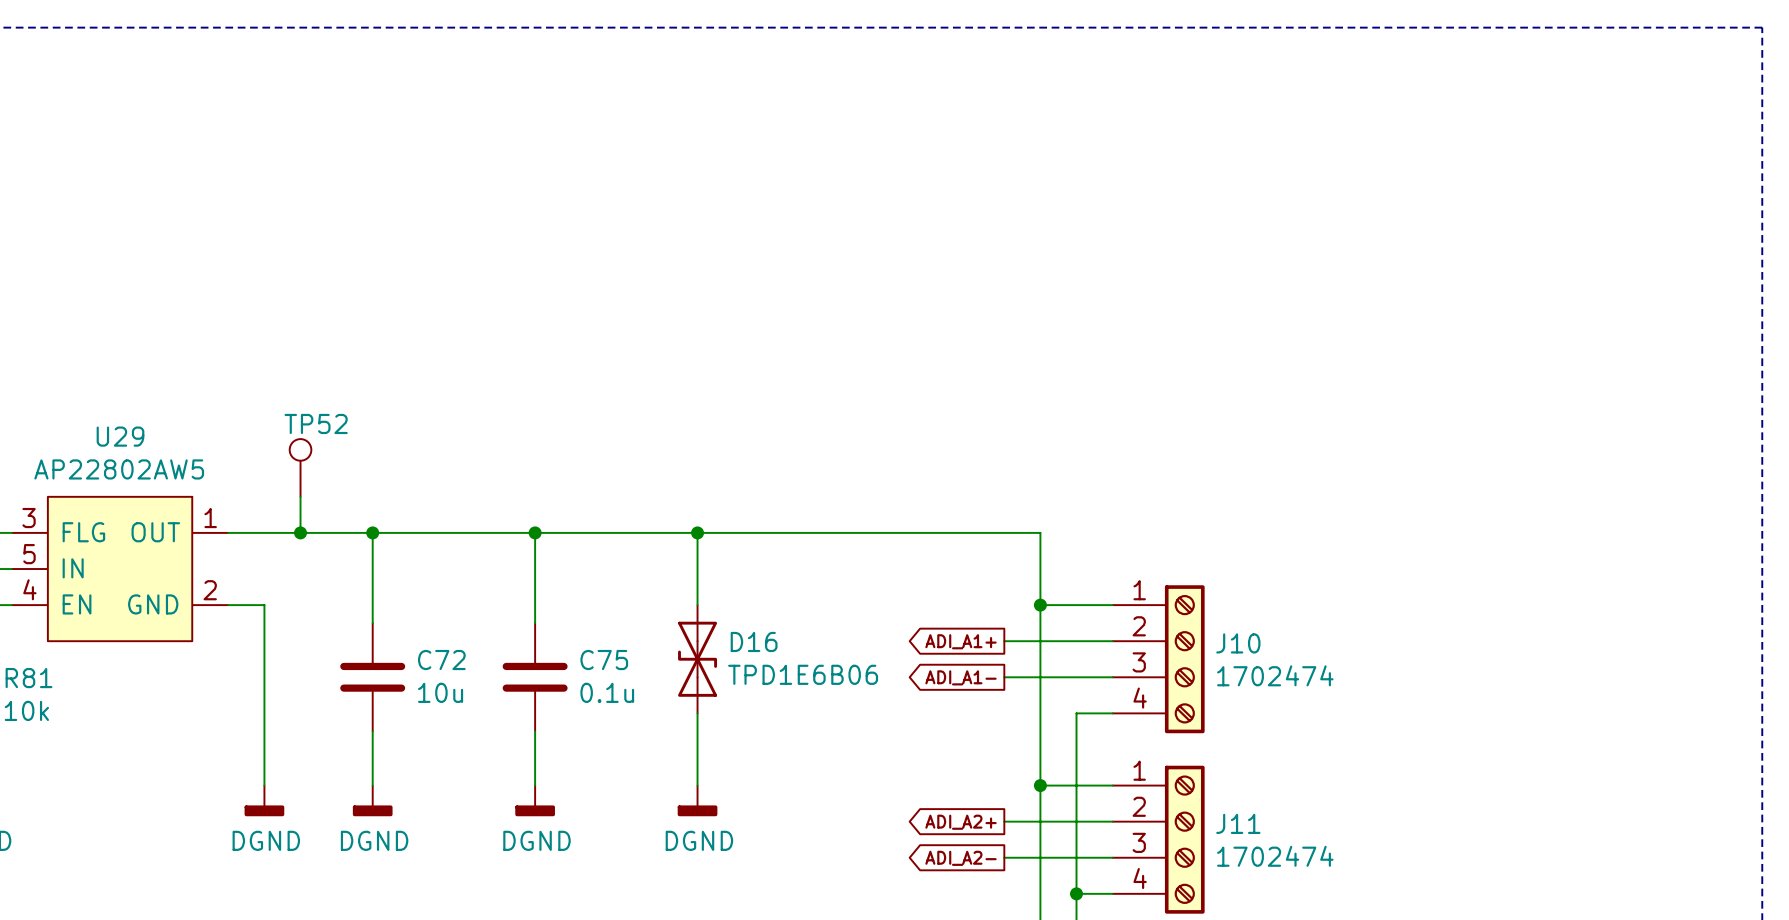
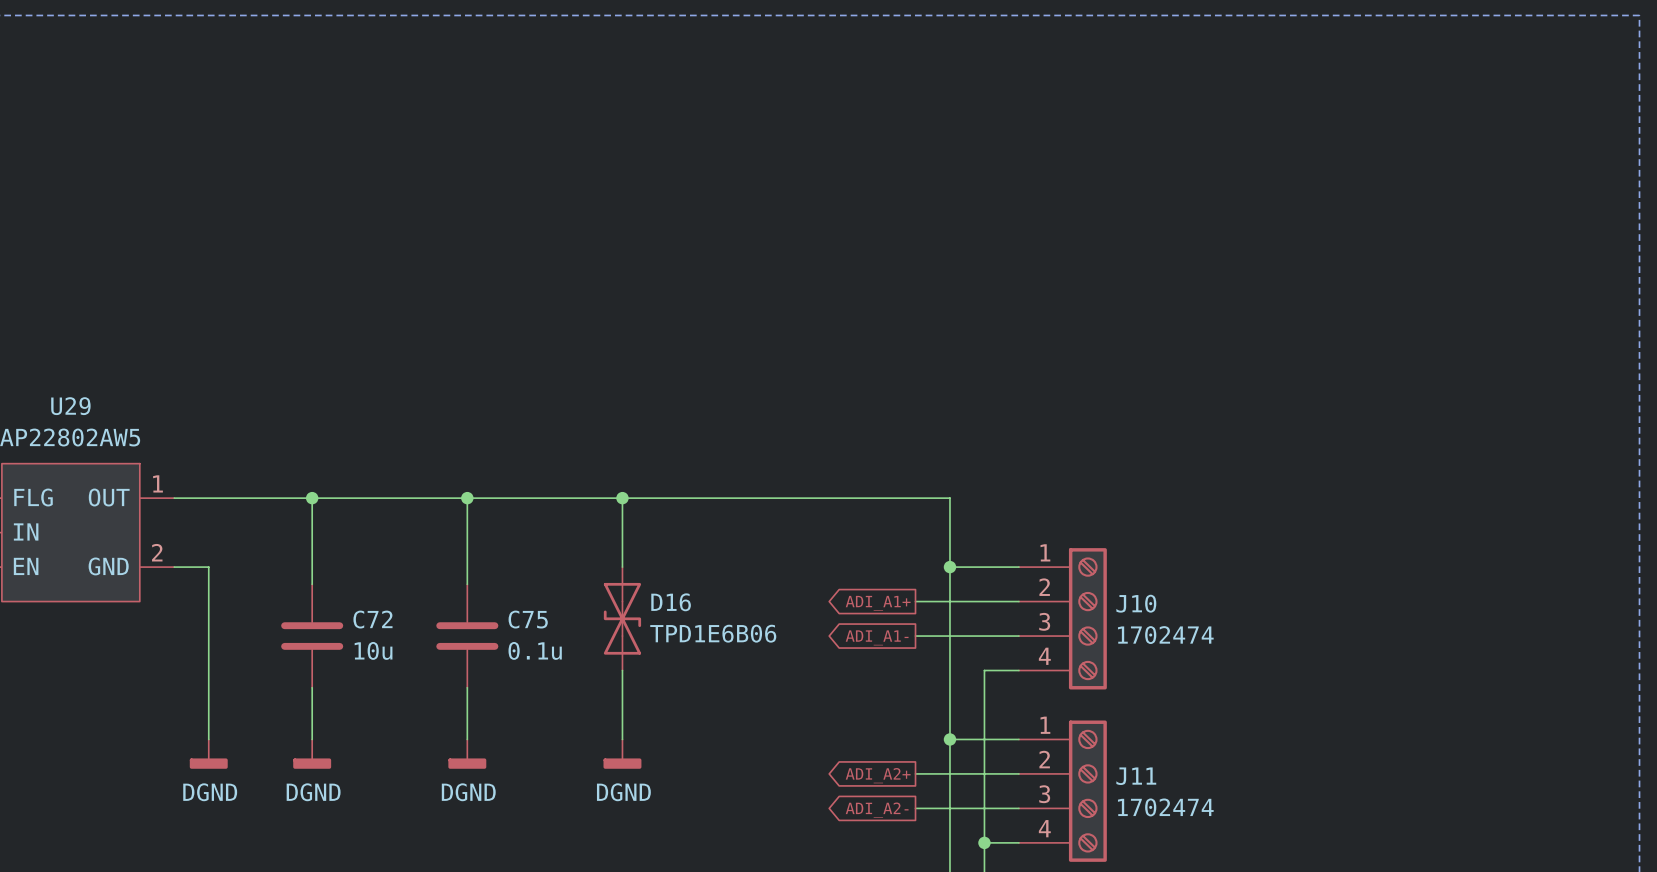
TP52: (300, 467) -> none
wire: (300, 496) (300, 532) -> none
junction: (300, 532) -> none

